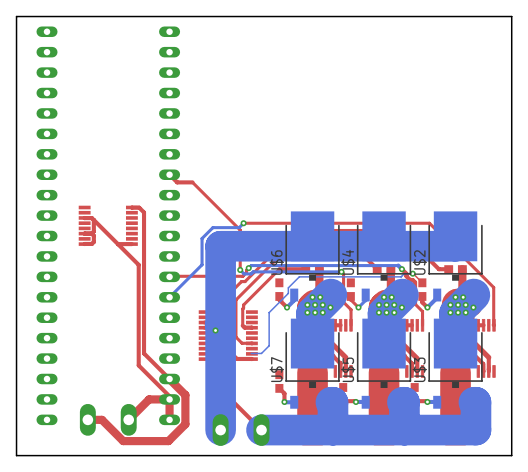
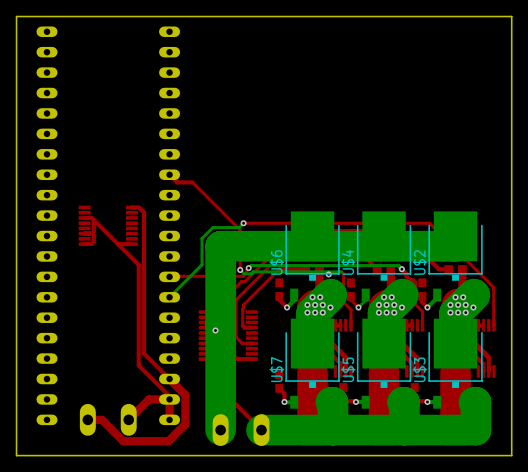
via position: (341, 271) -> (328, 274)
bottom track: (412, 273) (404, 273) (401, 276) (299, 276) (288, 287) (288, 293) (269, 312) (269, 345) (261, 353) (251, 353) -> none
top track: (412, 273) (422, 282) -> none
via: (412, 273) -> none

